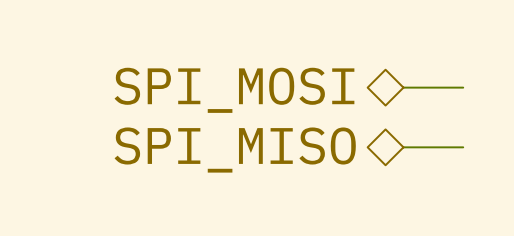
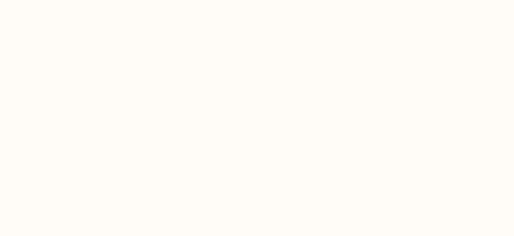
wire: (403, 87) (463, 87) -> none
hierarchical label: SPI_MOSI (234, 90) -> none
wire: (403, 147) (463, 147) -> none
hierarchical label: SPI_MISO (235, 150) -> none

